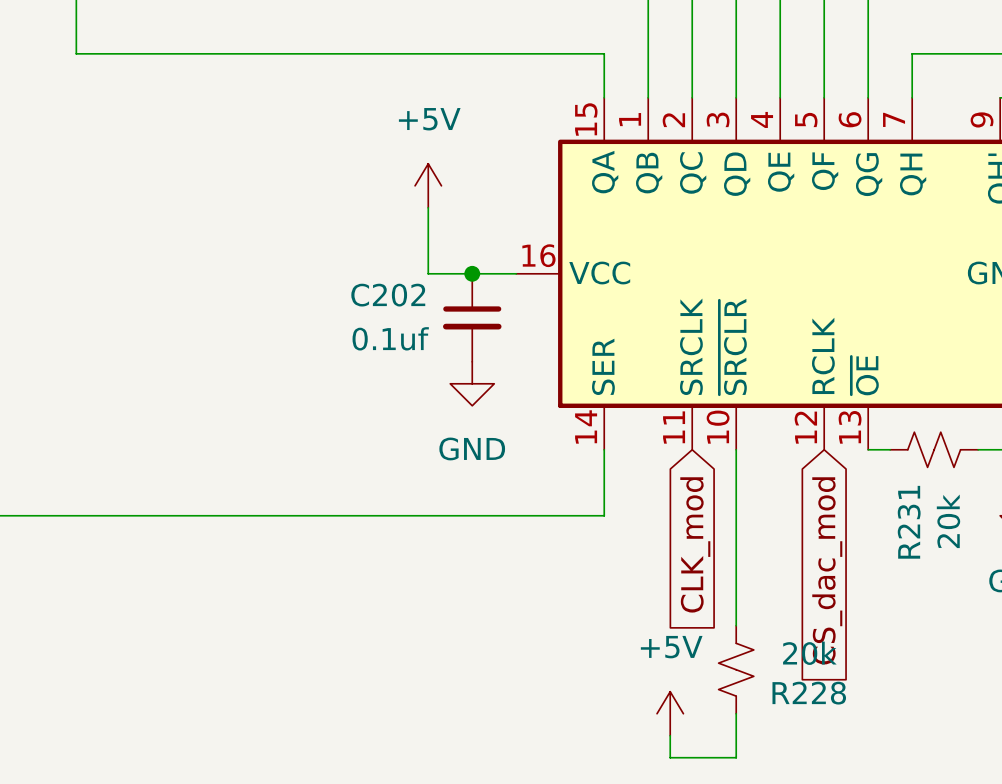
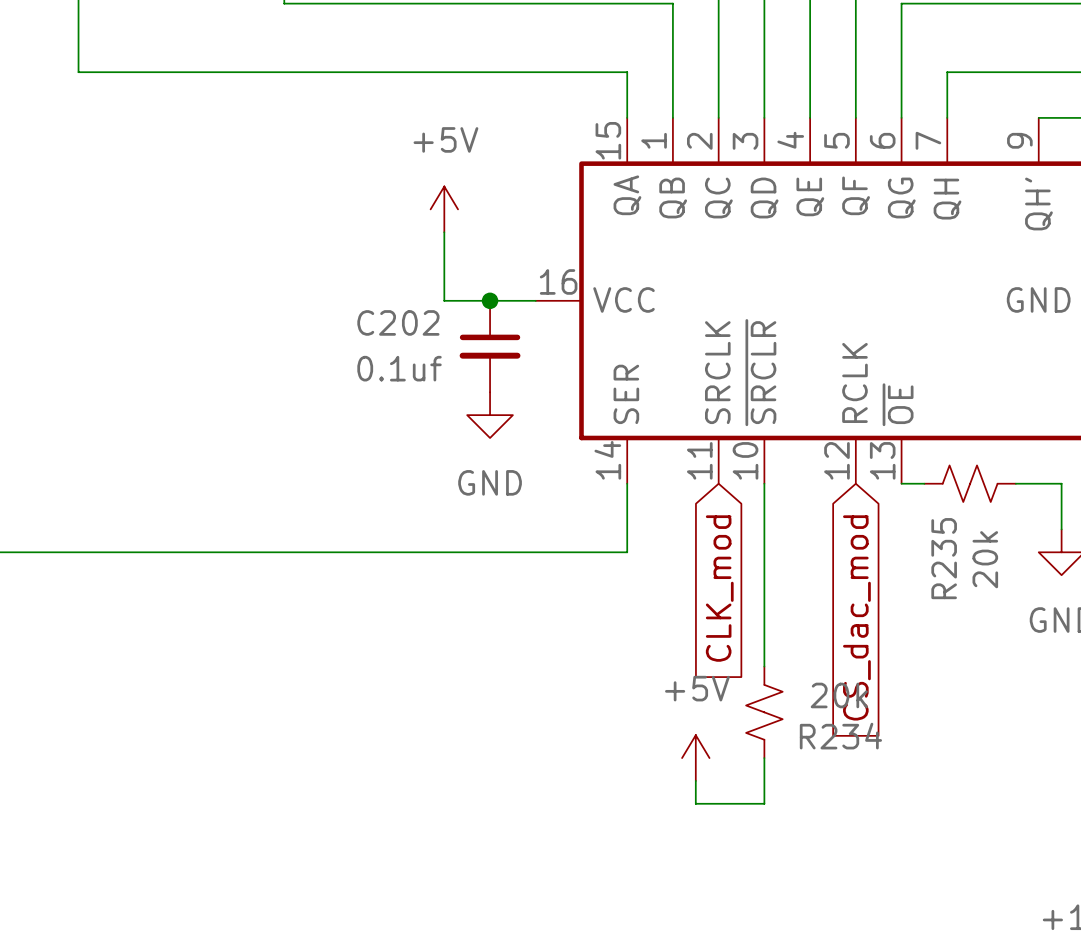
R231 name: R231 (909, 522) -> R235 (944, 558)
R228 name: R228 (809, 693) -> R234 (840, 736)

